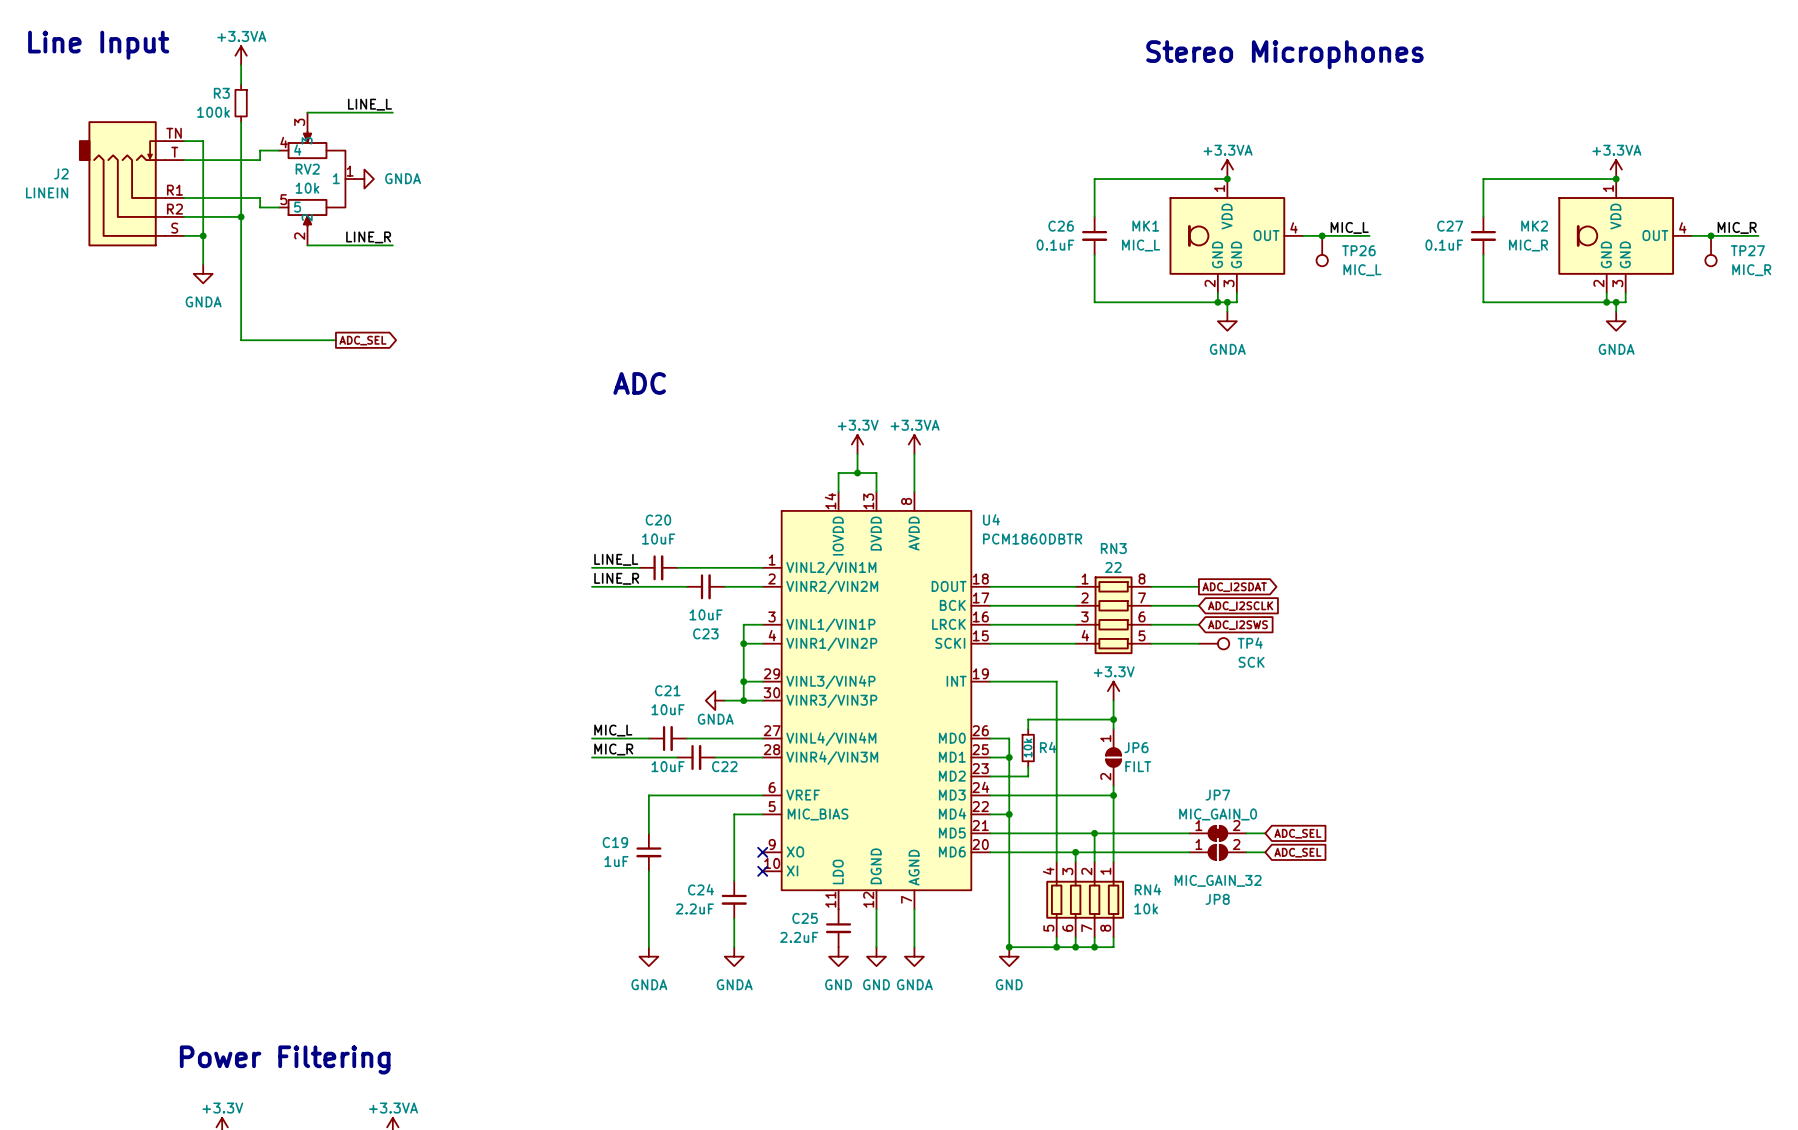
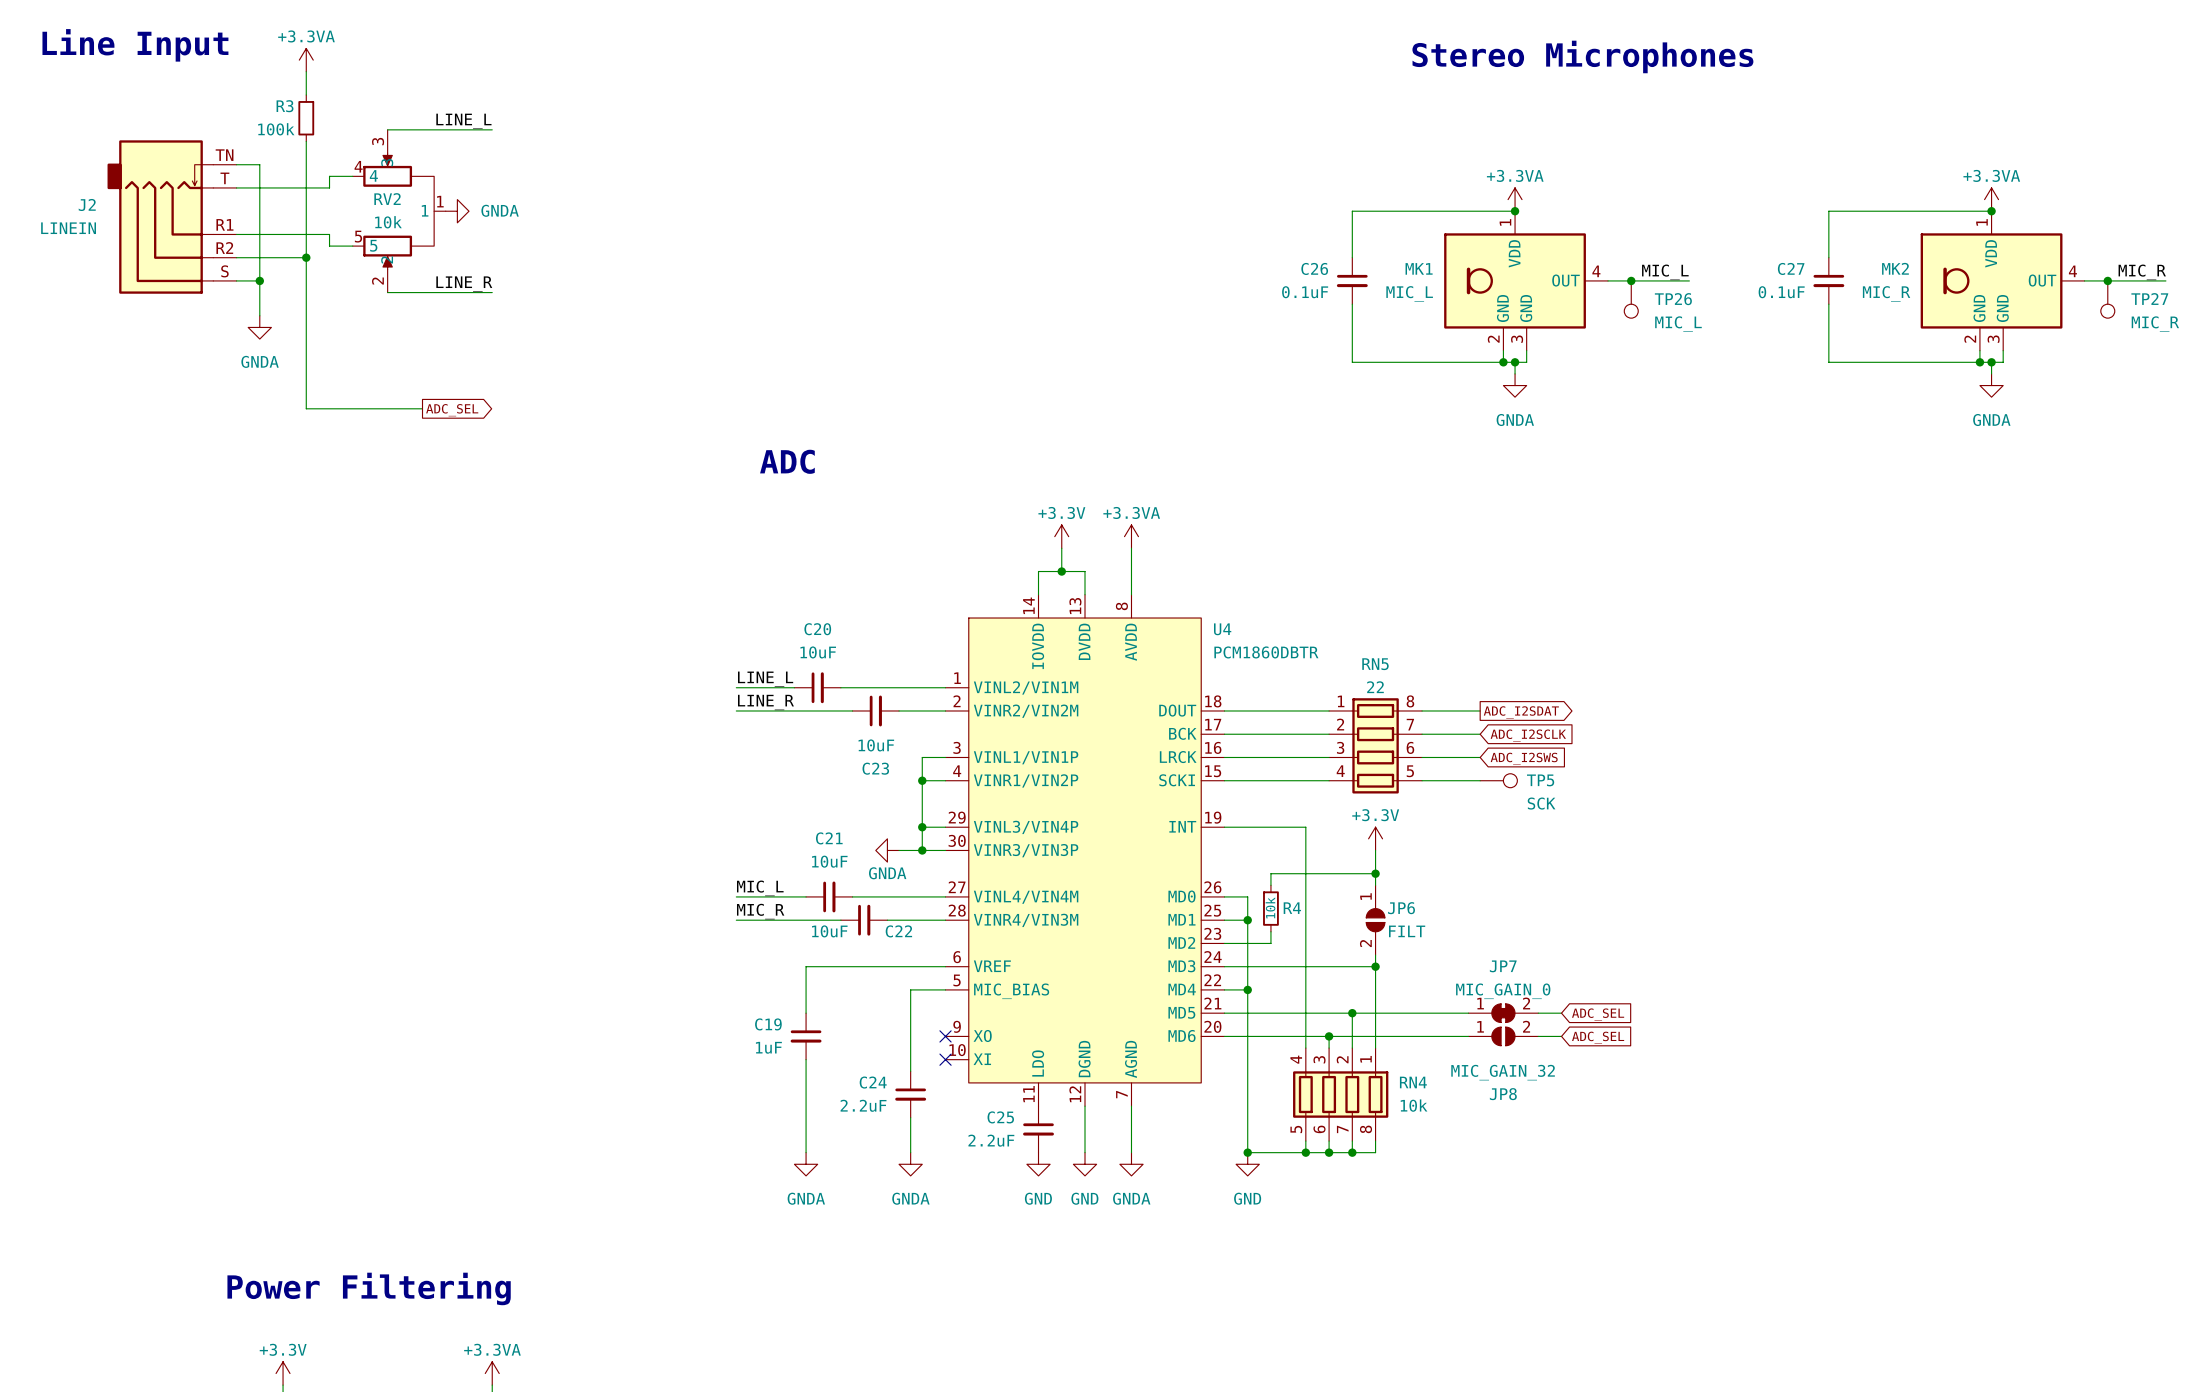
RN3 name: RN3 (1113, 548) -> RN5 (1375, 664)
TP4 name: TP4 (1250, 643) -> TP5 (1540, 780)

